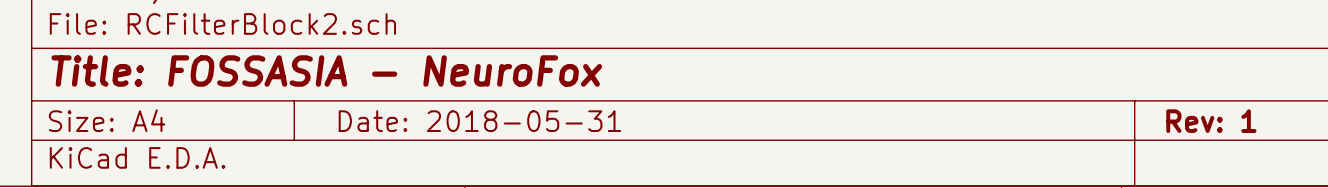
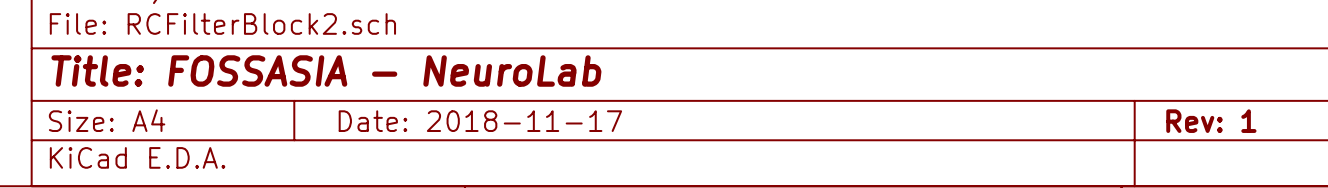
title block: Title: FOSSASIA - NeuroFox (326, 71) -> Title: FOSSASIA - NeuroLab (326, 71)
title block: Date: 2018-05-31 (479, 121) -> Date: 2018-11-17 (480, 121)

